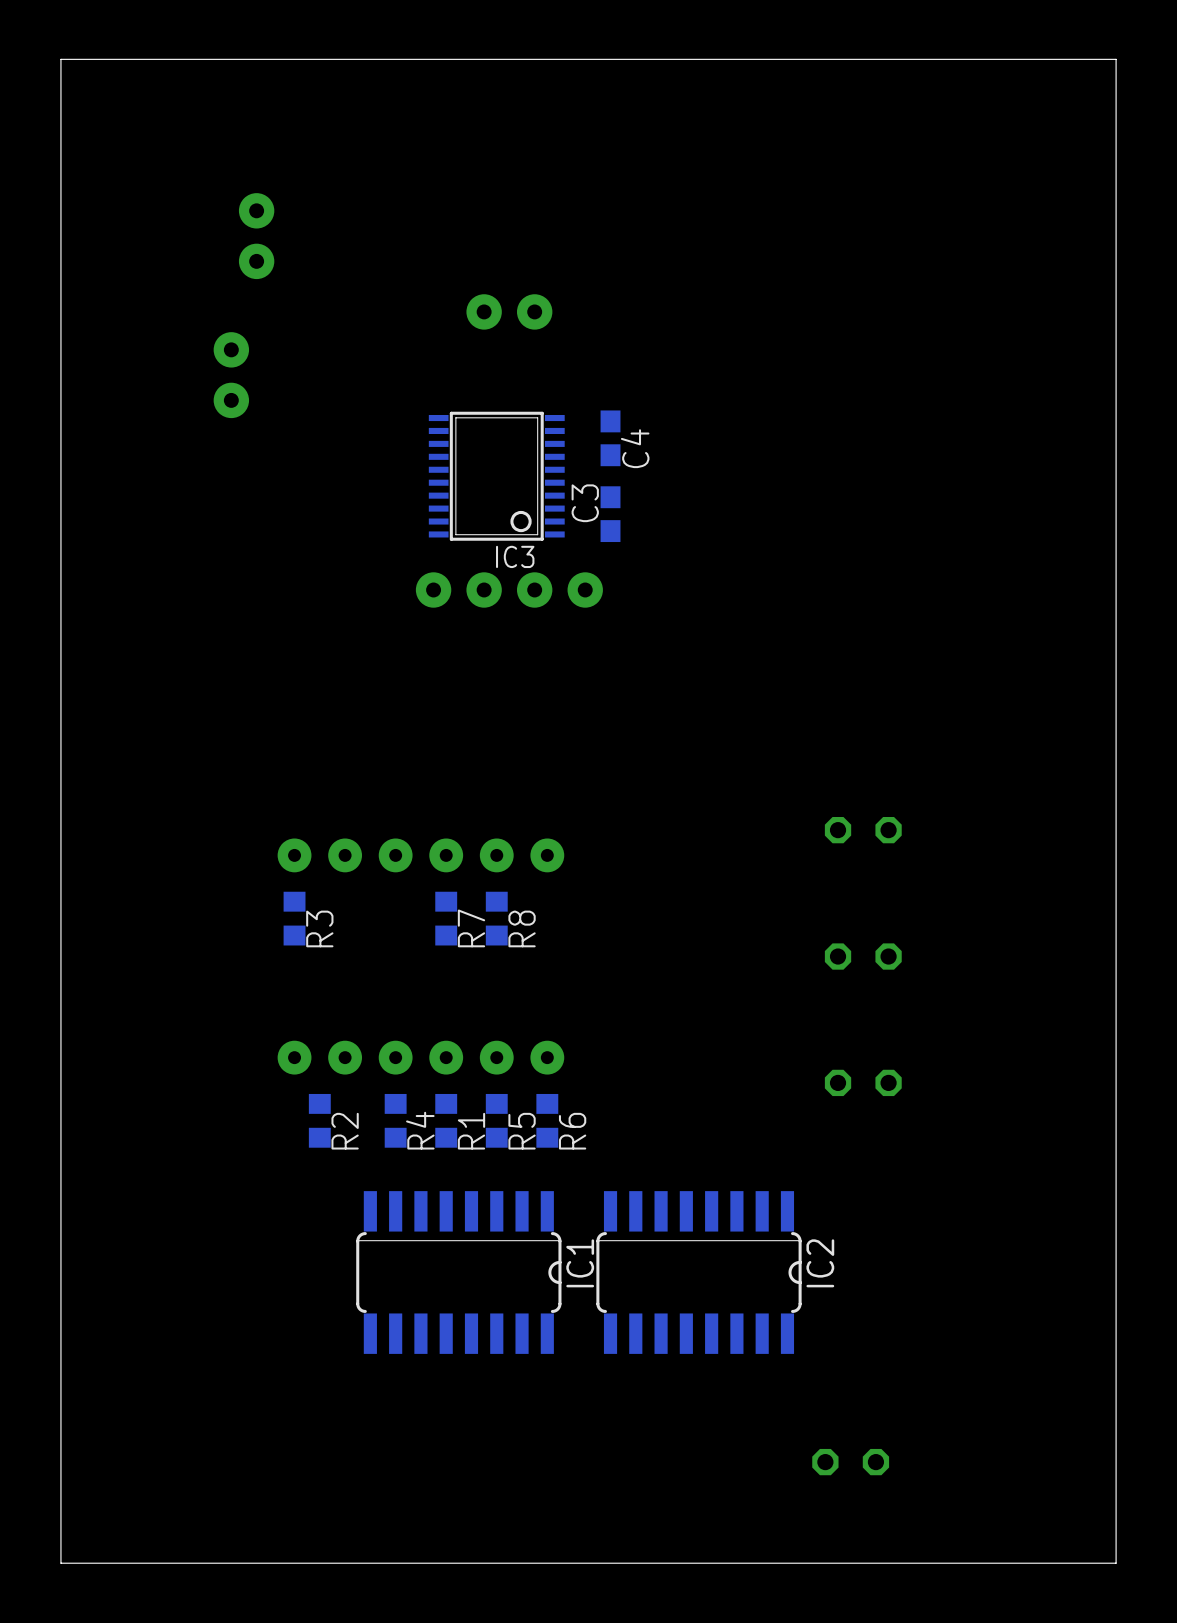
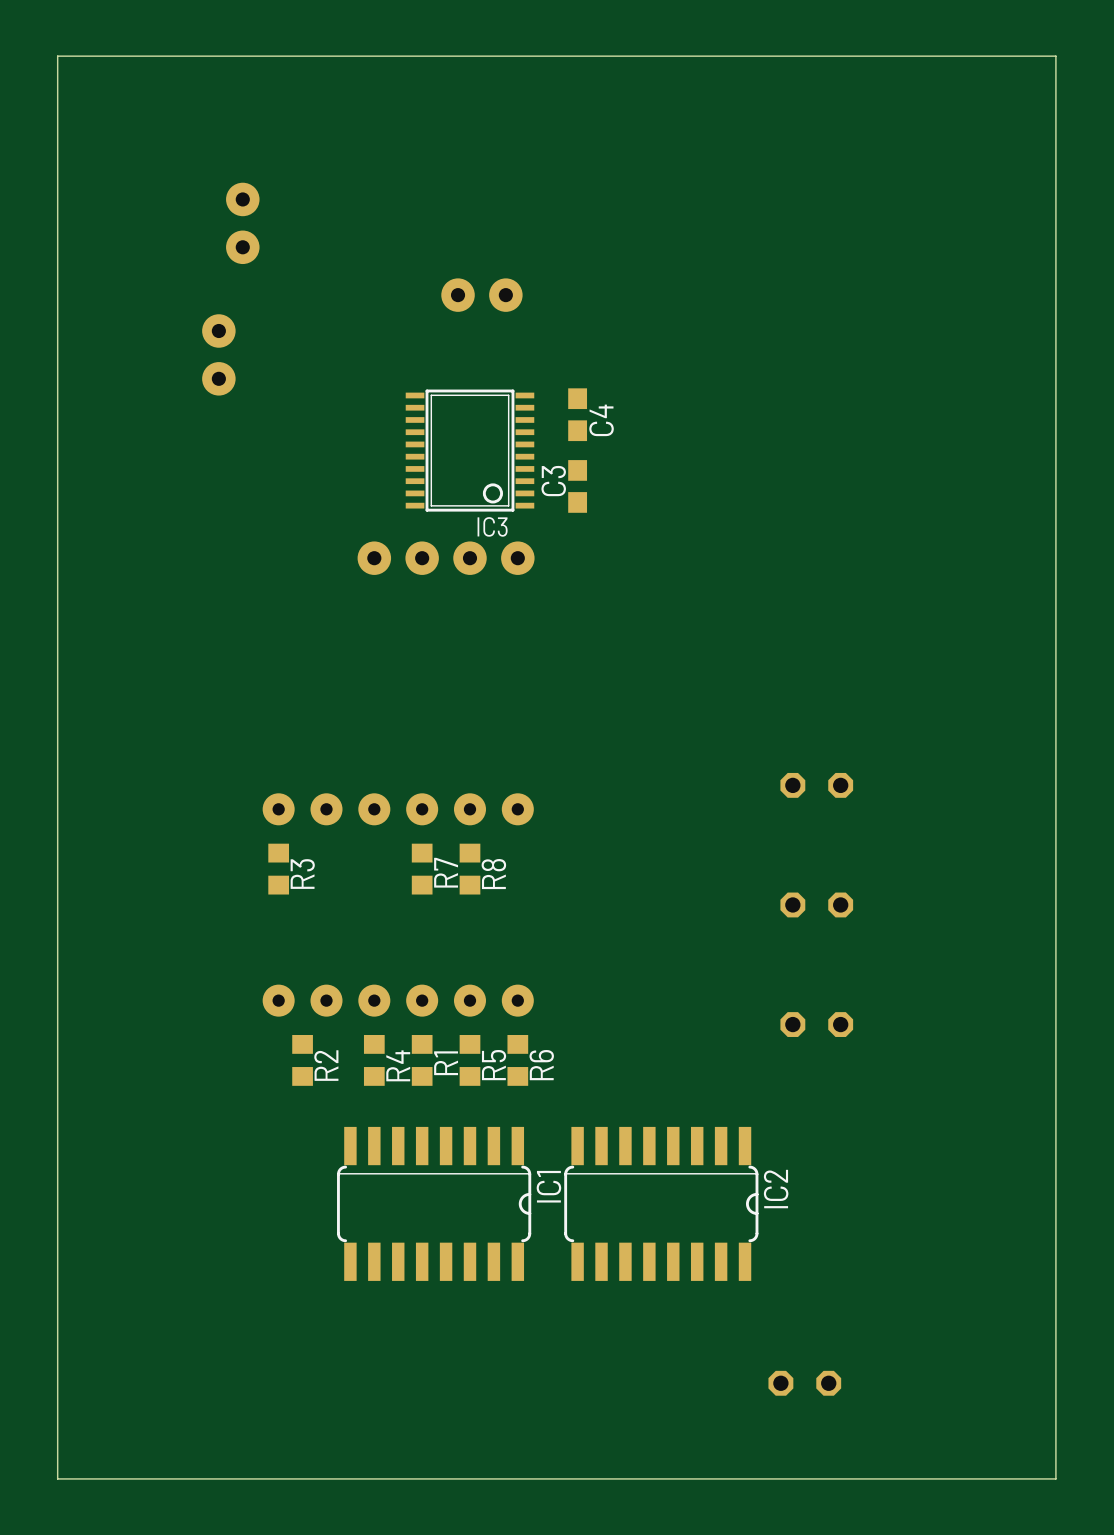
part position: (509, 589) -> (446, 558)

